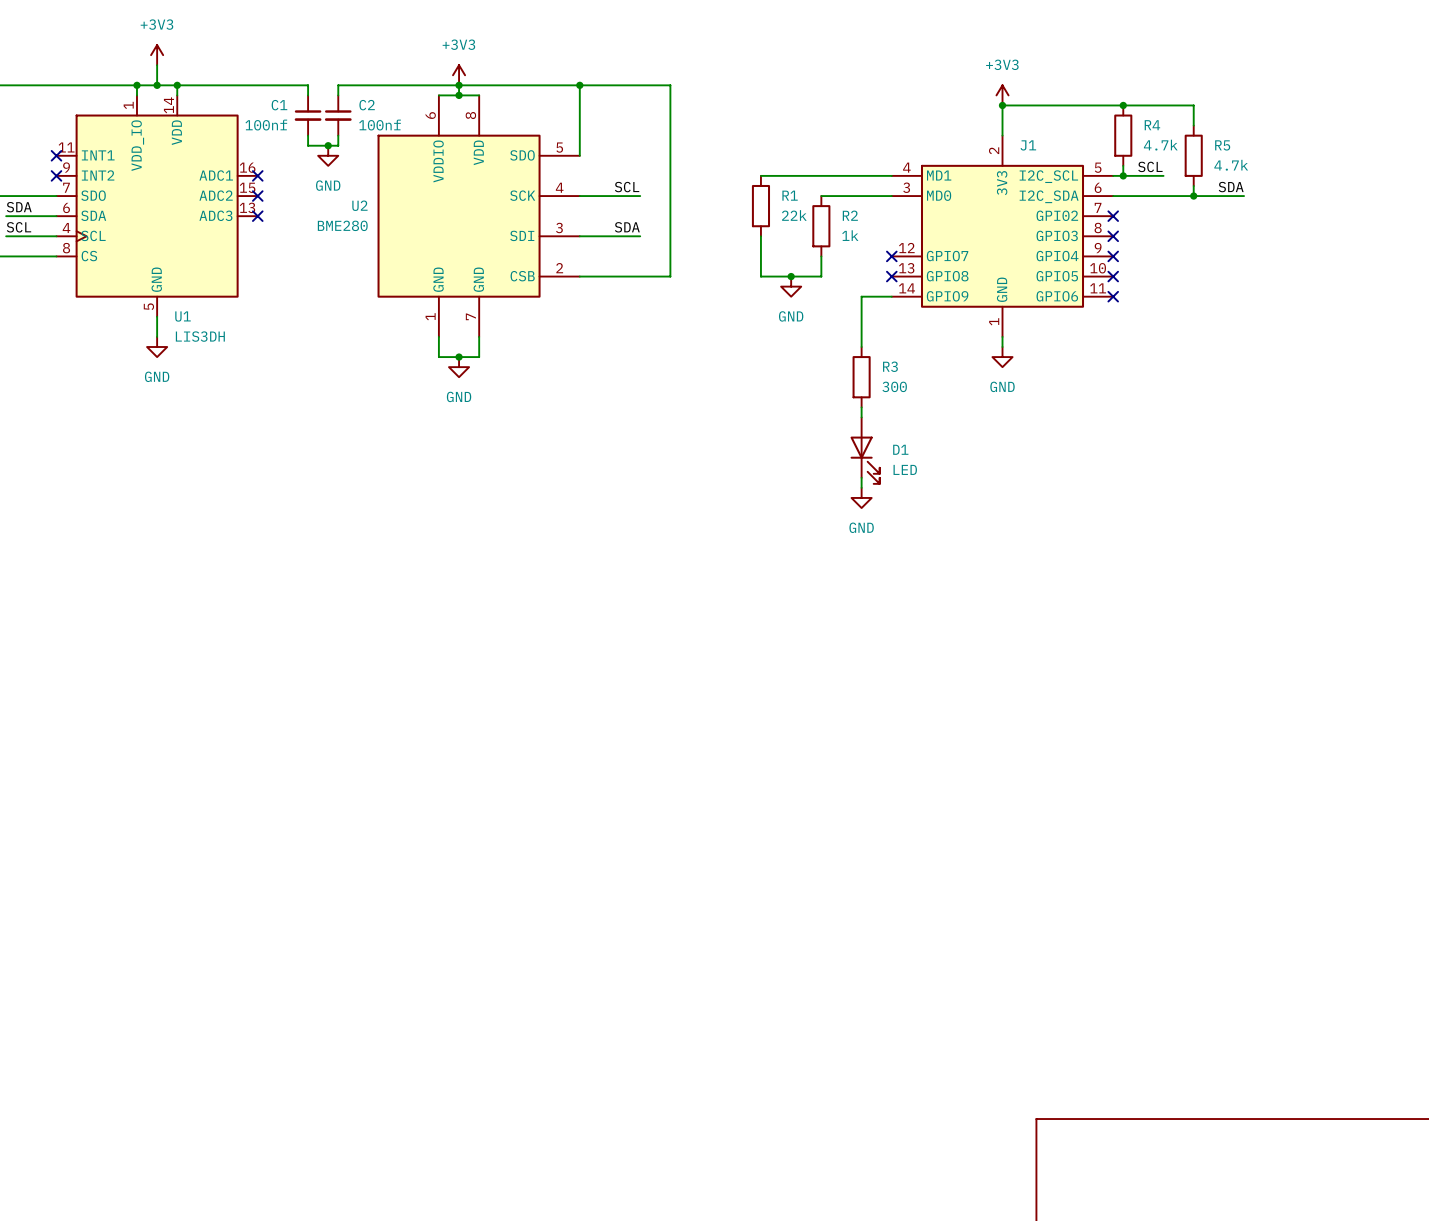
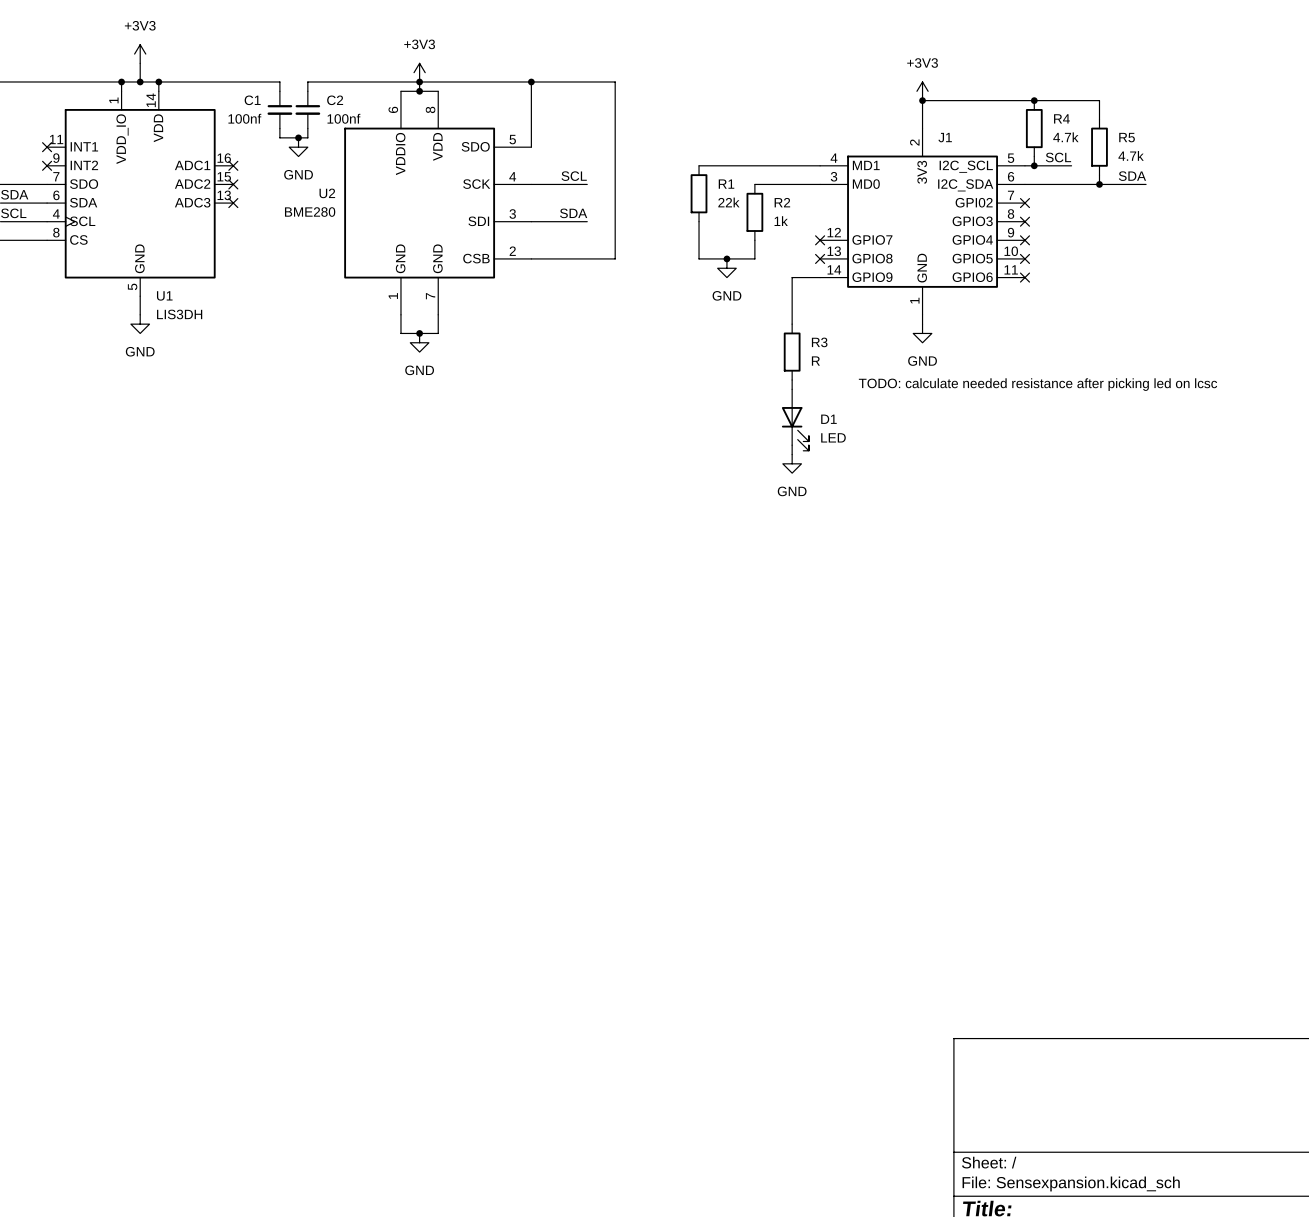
R3 value: 300 (894, 386) -> R (815, 361)
text: none -> TODO: calculate needed resistance after picking led on lcsc (1038, 384)

